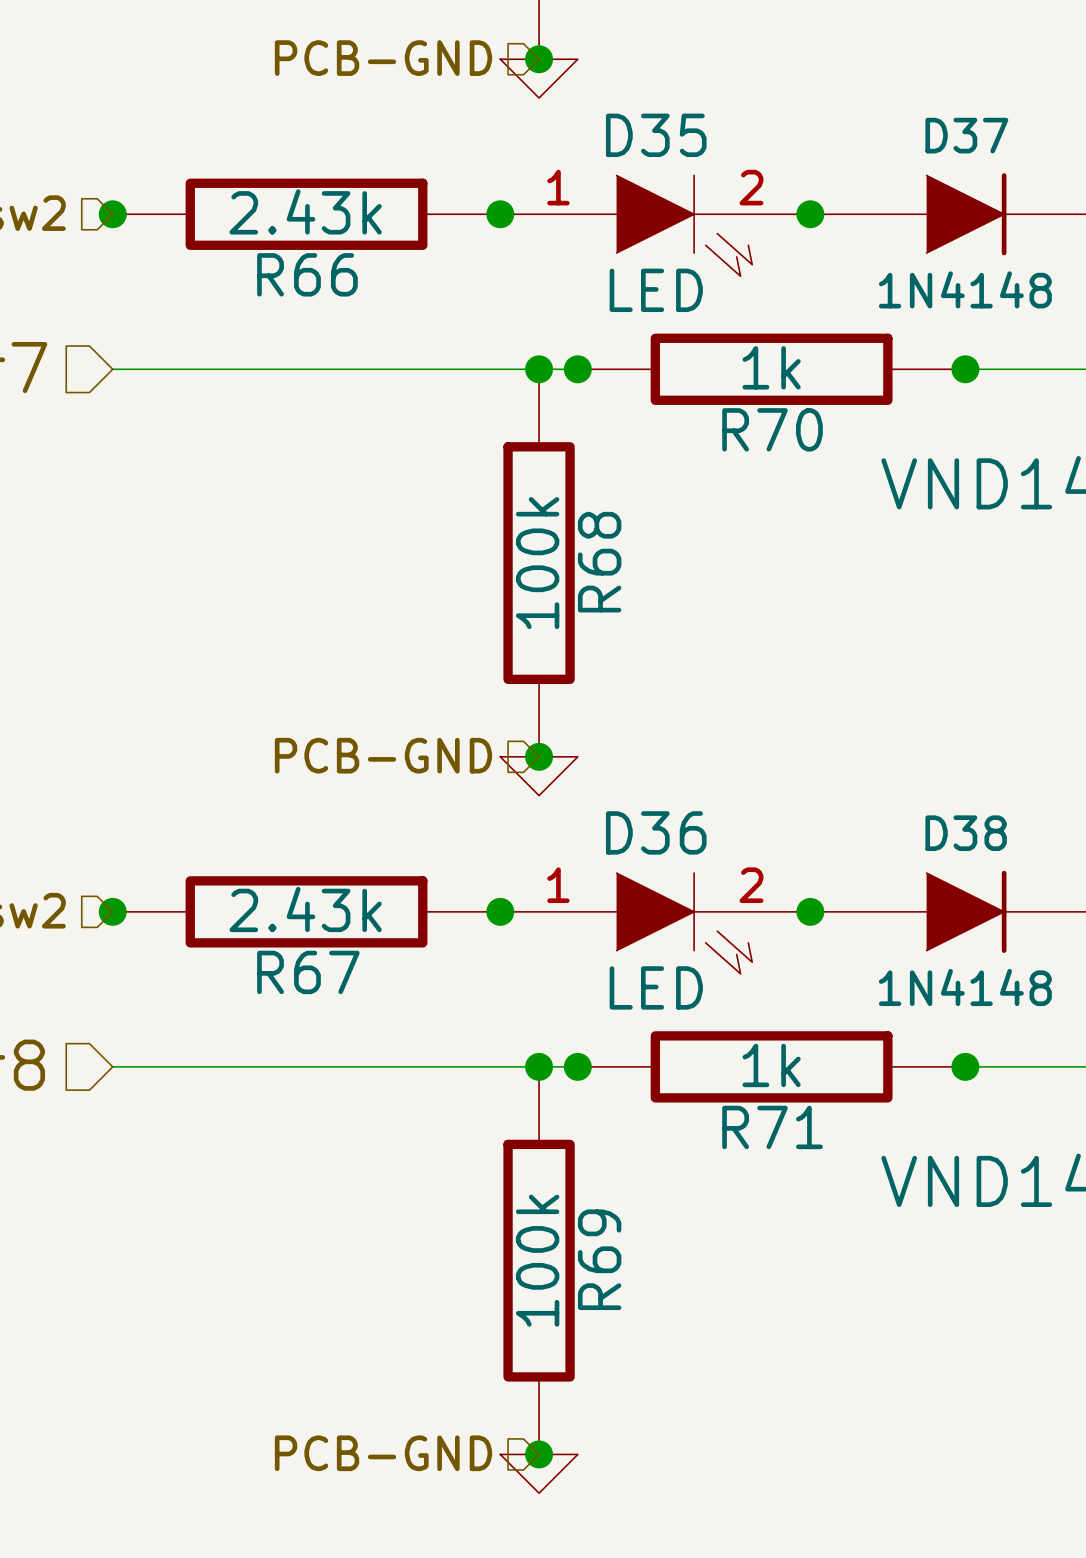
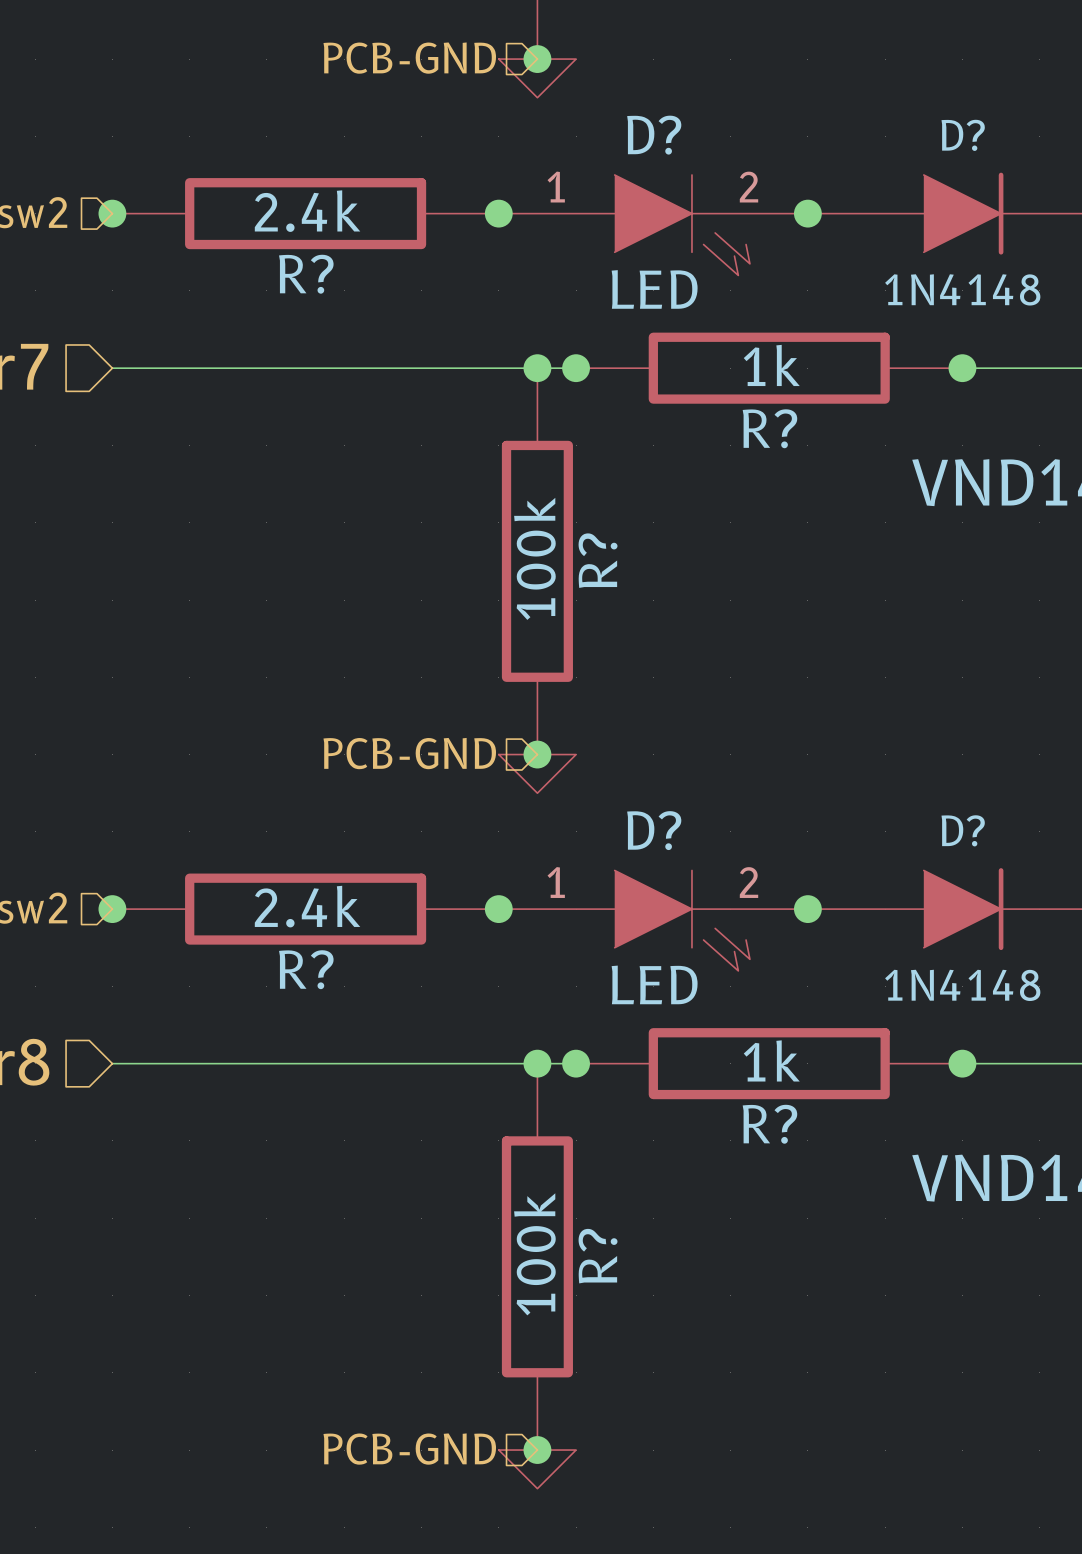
D35 name: D35 (656, 135) -> D? (654, 135)
D37 name: D37 (966, 135) -> D? (963, 135)
R66 value: 2.43k (305, 211) -> 2.4k (307, 211)
R66 name: R66 (307, 274) -> R? (306, 274)
R70 name: R70 (772, 429) -> R? (769, 428)
R68 name: R68 (599, 562) -> R? (598, 560)
D36 name: D36 (656, 832) -> D? (654, 830)
D38 name: D38 (966, 833) -> D? (963, 830)
R67 value: 2.43k (305, 909) -> 2.4k (307, 906)
R67 name: R67 (308, 972) -> R? (306, 969)
R71 name: R71 (772, 1127) -> R? (769, 1124)
R69 name: R69 (599, 1259) -> R? (598, 1256)

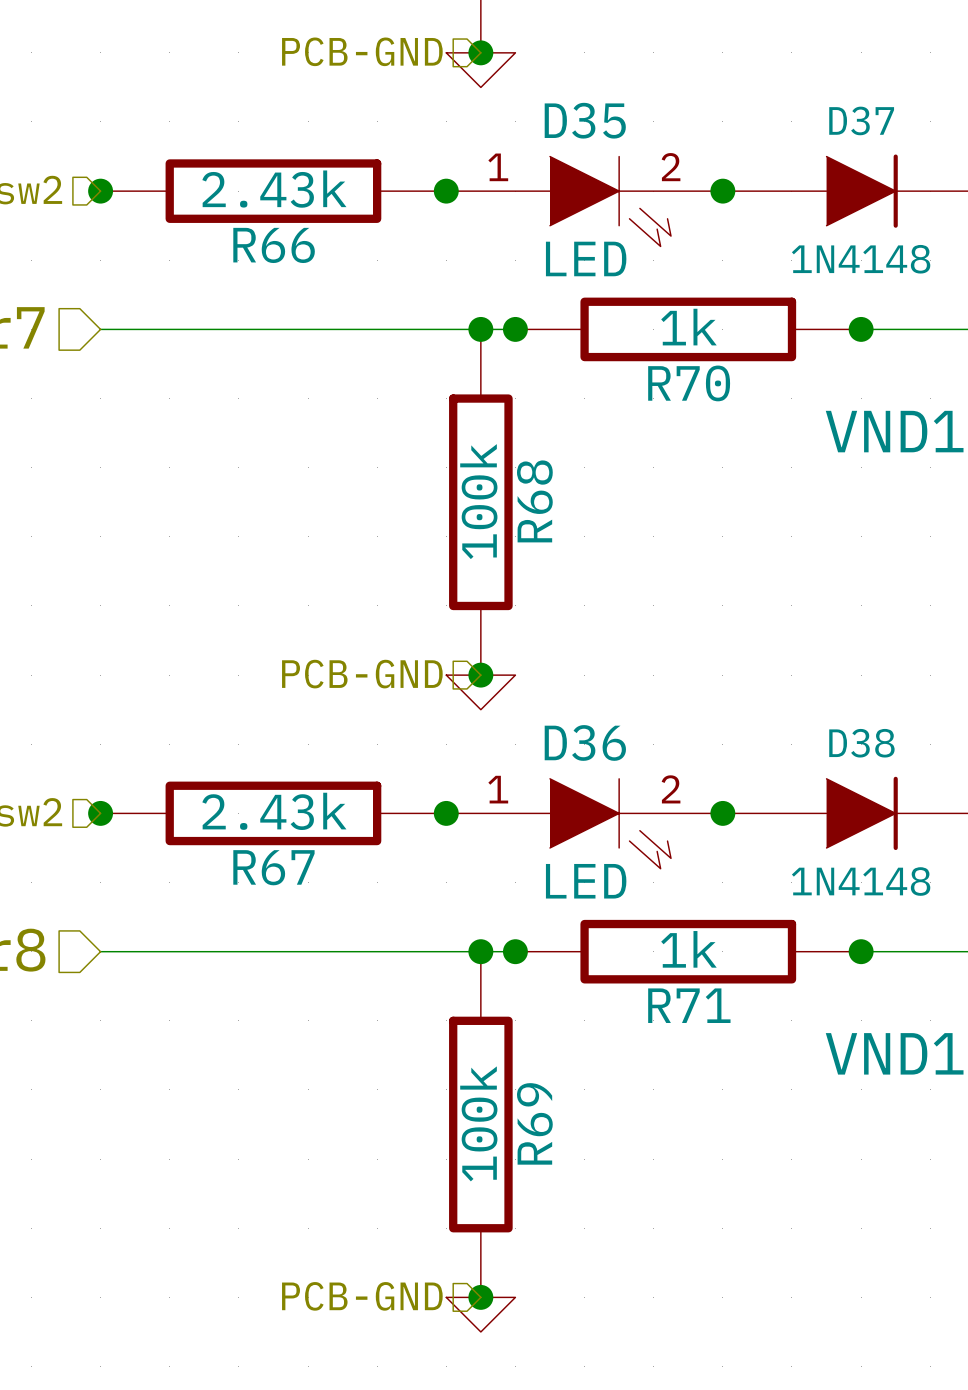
D? name: D? (654, 135) -> D35 (585, 120)
D? name: D? (963, 135) -> D37 (861, 120)
R? value: 2.4k (307, 211) -> 2.43k (274, 189)
R? name: R? (306, 274) -> R66 (274, 245)
R? name: R? (769, 428) -> R70 (689, 383)
R? name: R? (598, 560) -> R68 (534, 501)
D? name: D? (654, 830) -> D36 (585, 742)
D? name: D? (963, 830) -> D38 (861, 743)
R? value: 2.4k (307, 906) -> 2.43k (274, 811)
R? name: R? (306, 969) -> R67 (273, 867)
R? name: R? (769, 1124) -> R71 (689, 1005)
R? name: R? (598, 1256) -> R69 (534, 1123)

